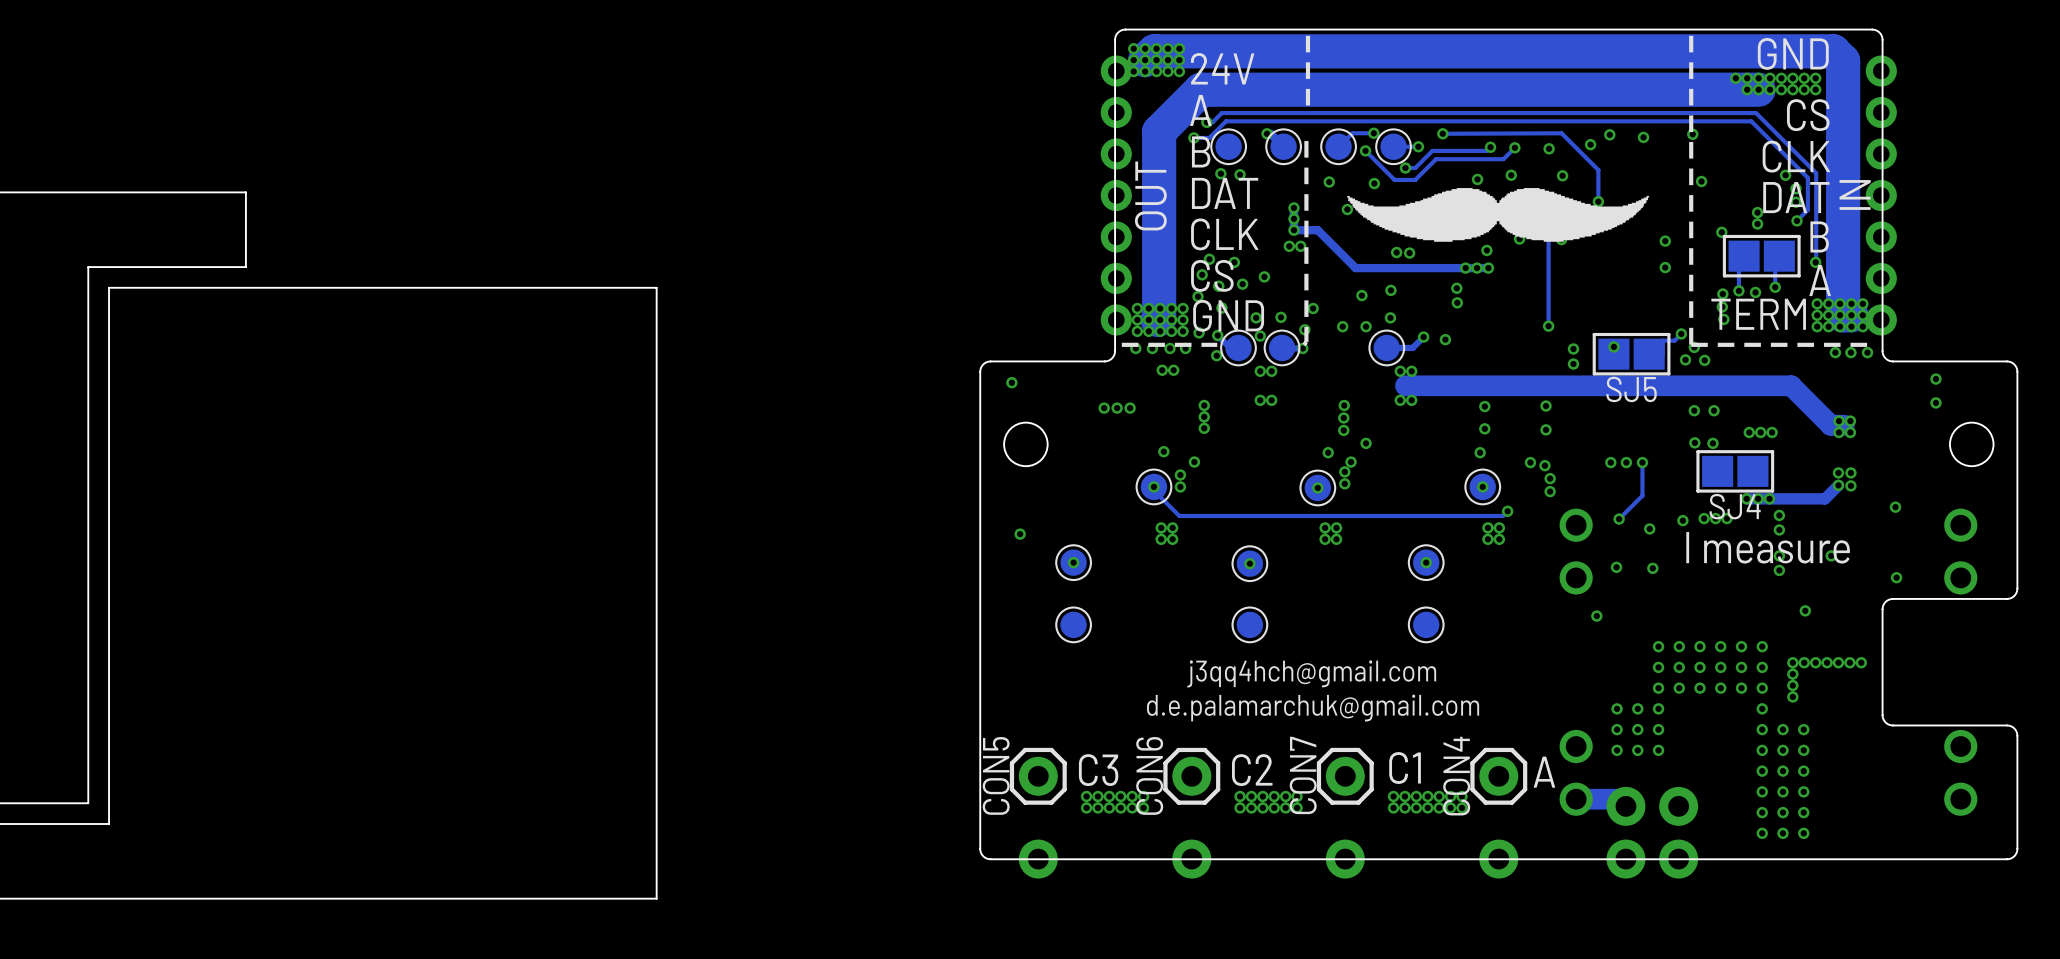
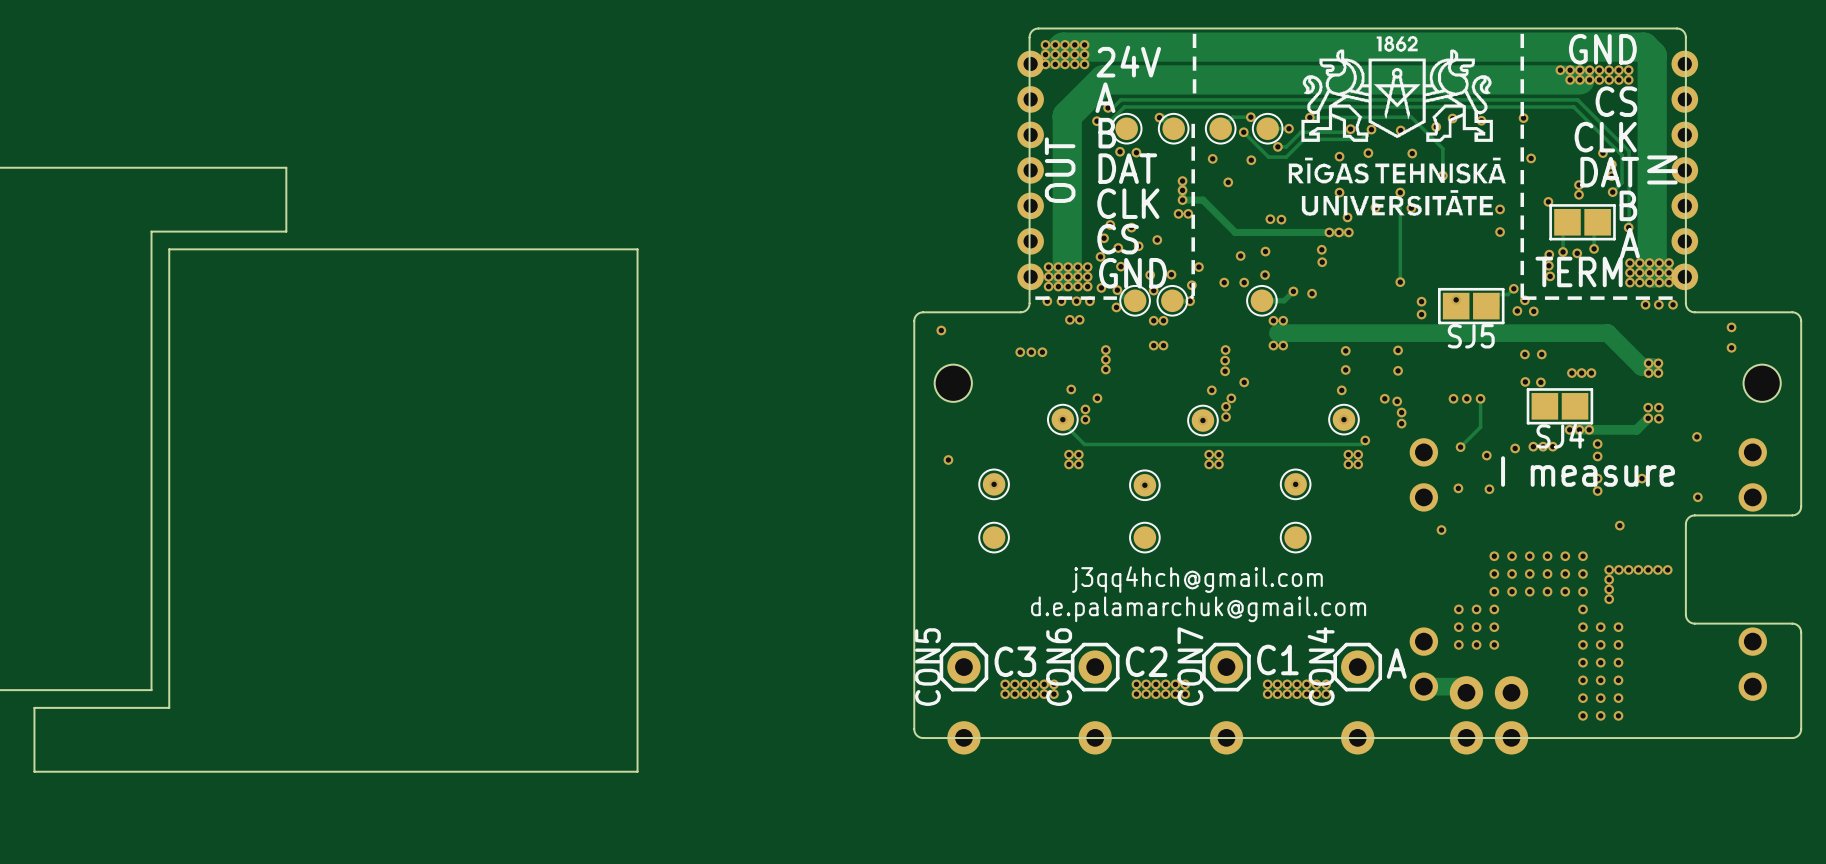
drawing: none -> [1288, 36, 1506, 216]
drawing: [1347, 188, 1650, 242] -> none

